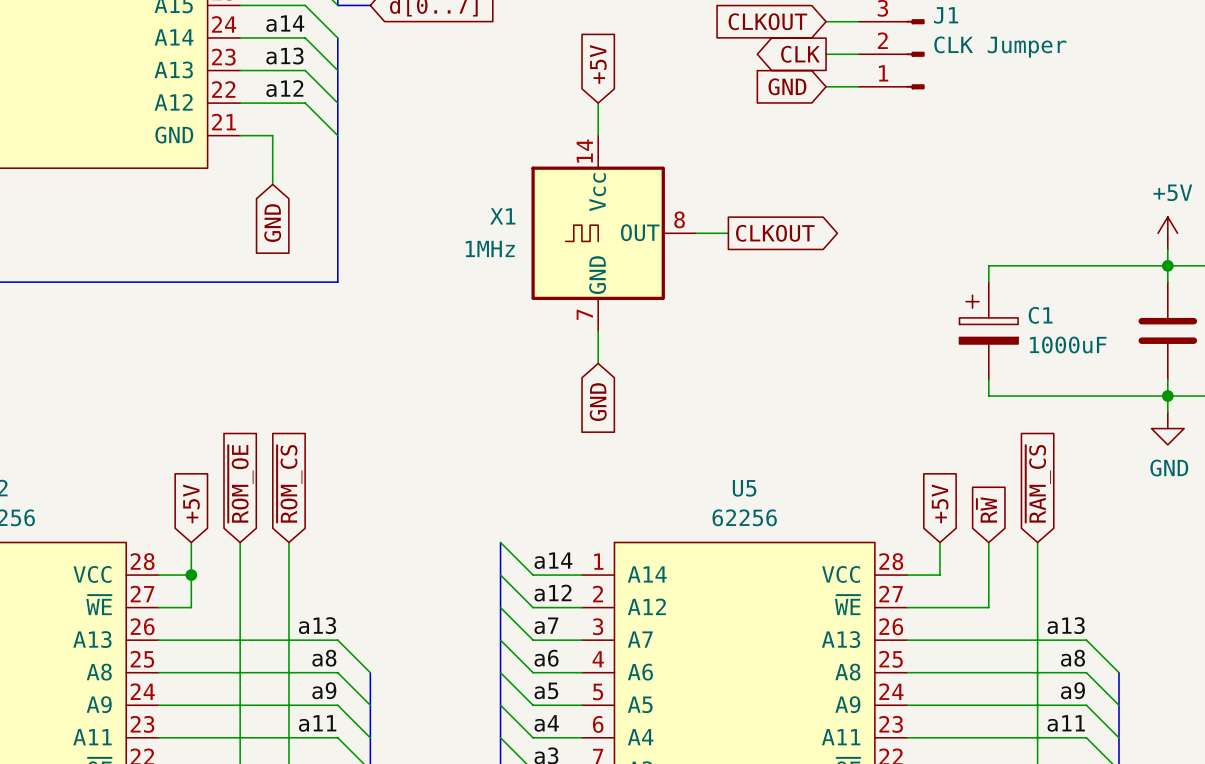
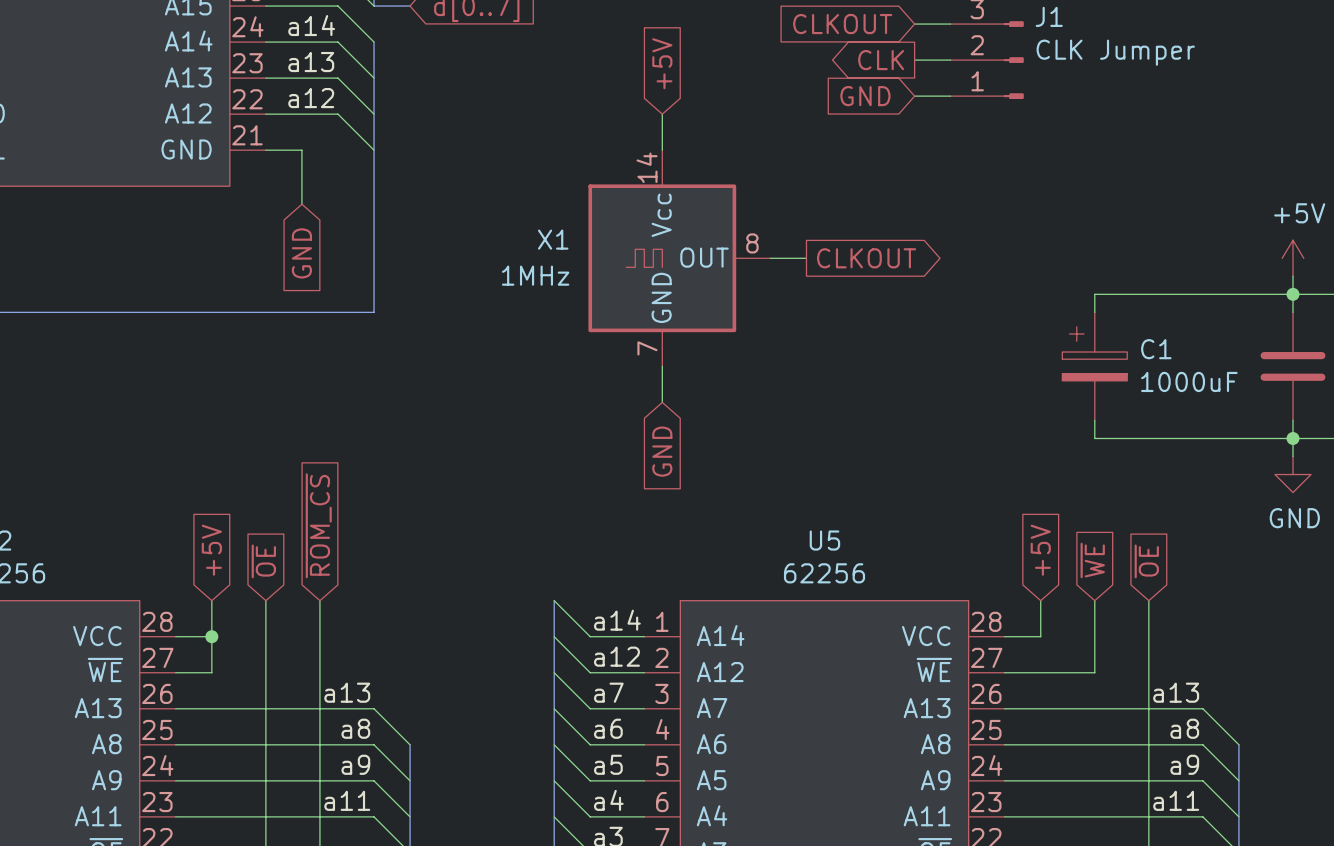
global label: ~{ROM_OE} (240, 483) -> ~{OE} (263, 561)
global label: ~{RAM_CS} (1038, 483) -> ~{OE} (1146, 561)
global label: R~{W} (986, 509) -> ~{WE} (1092, 560)

